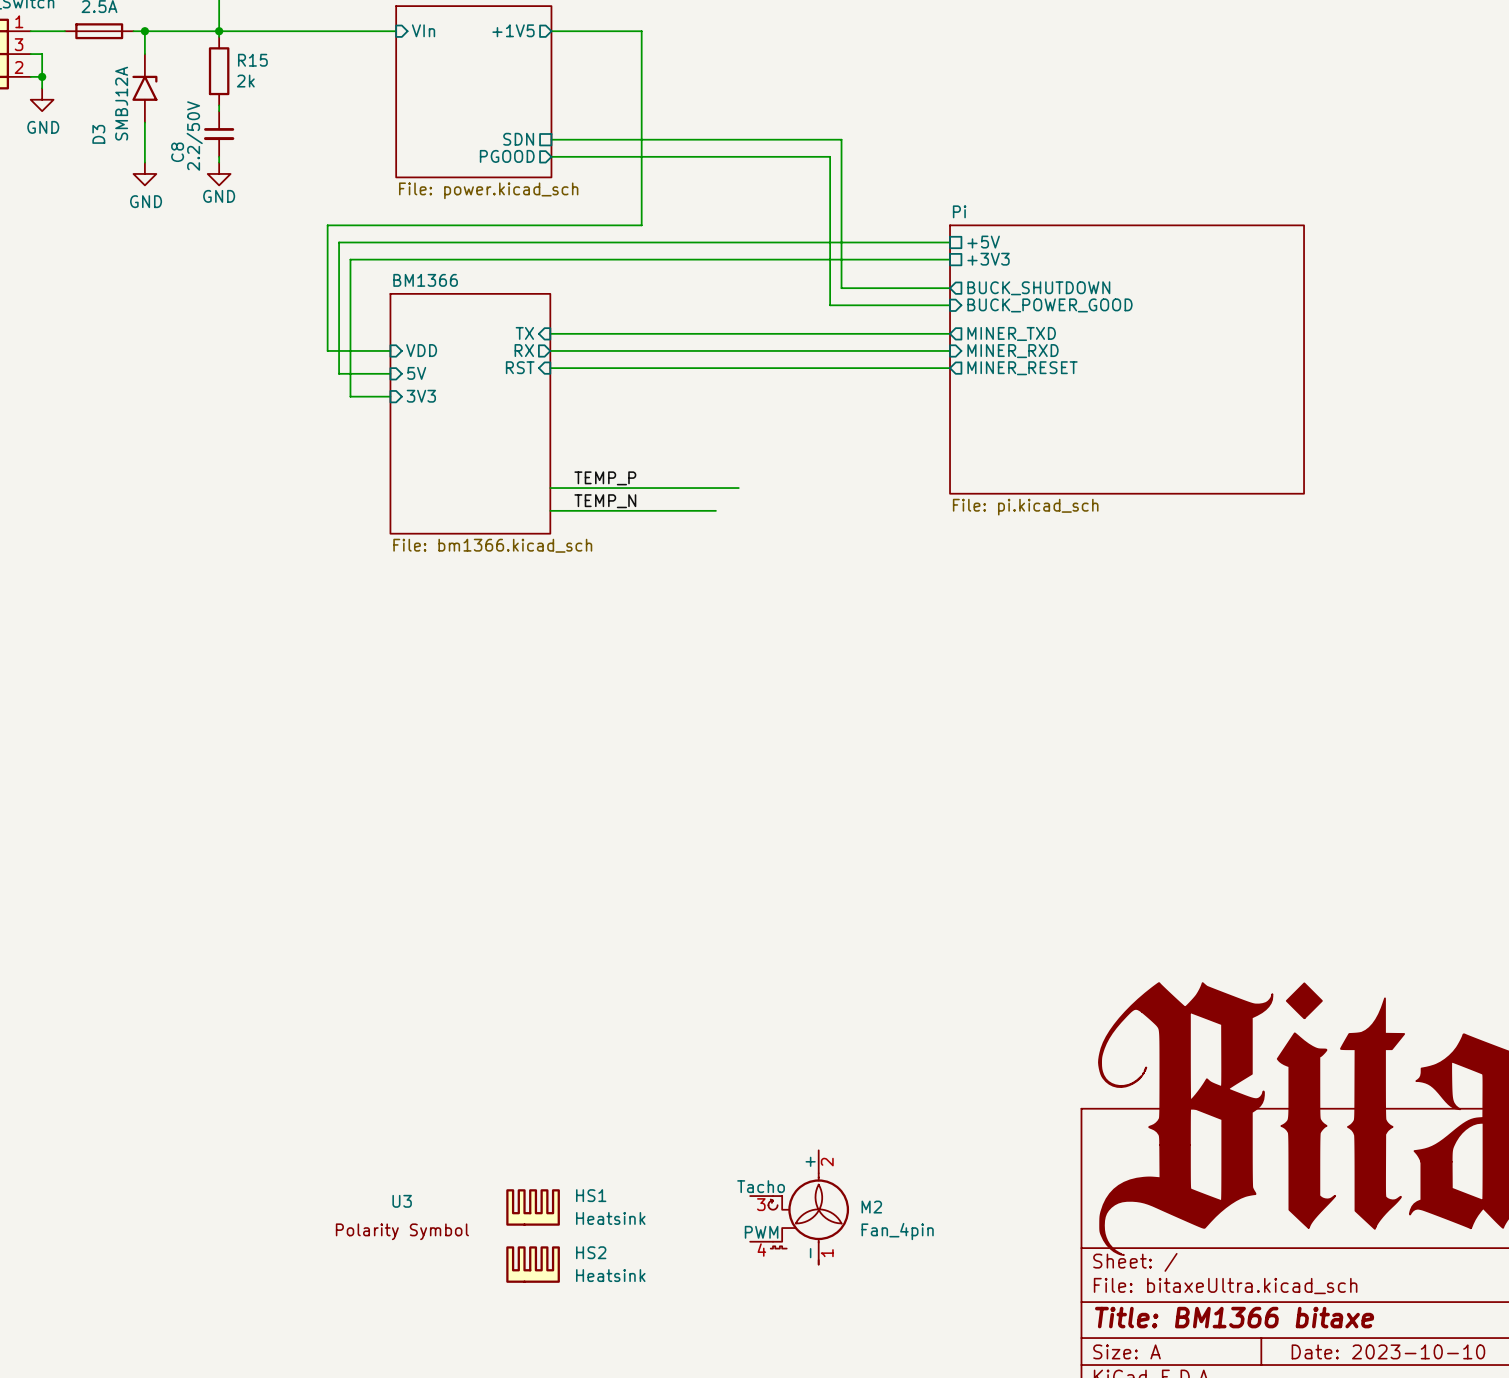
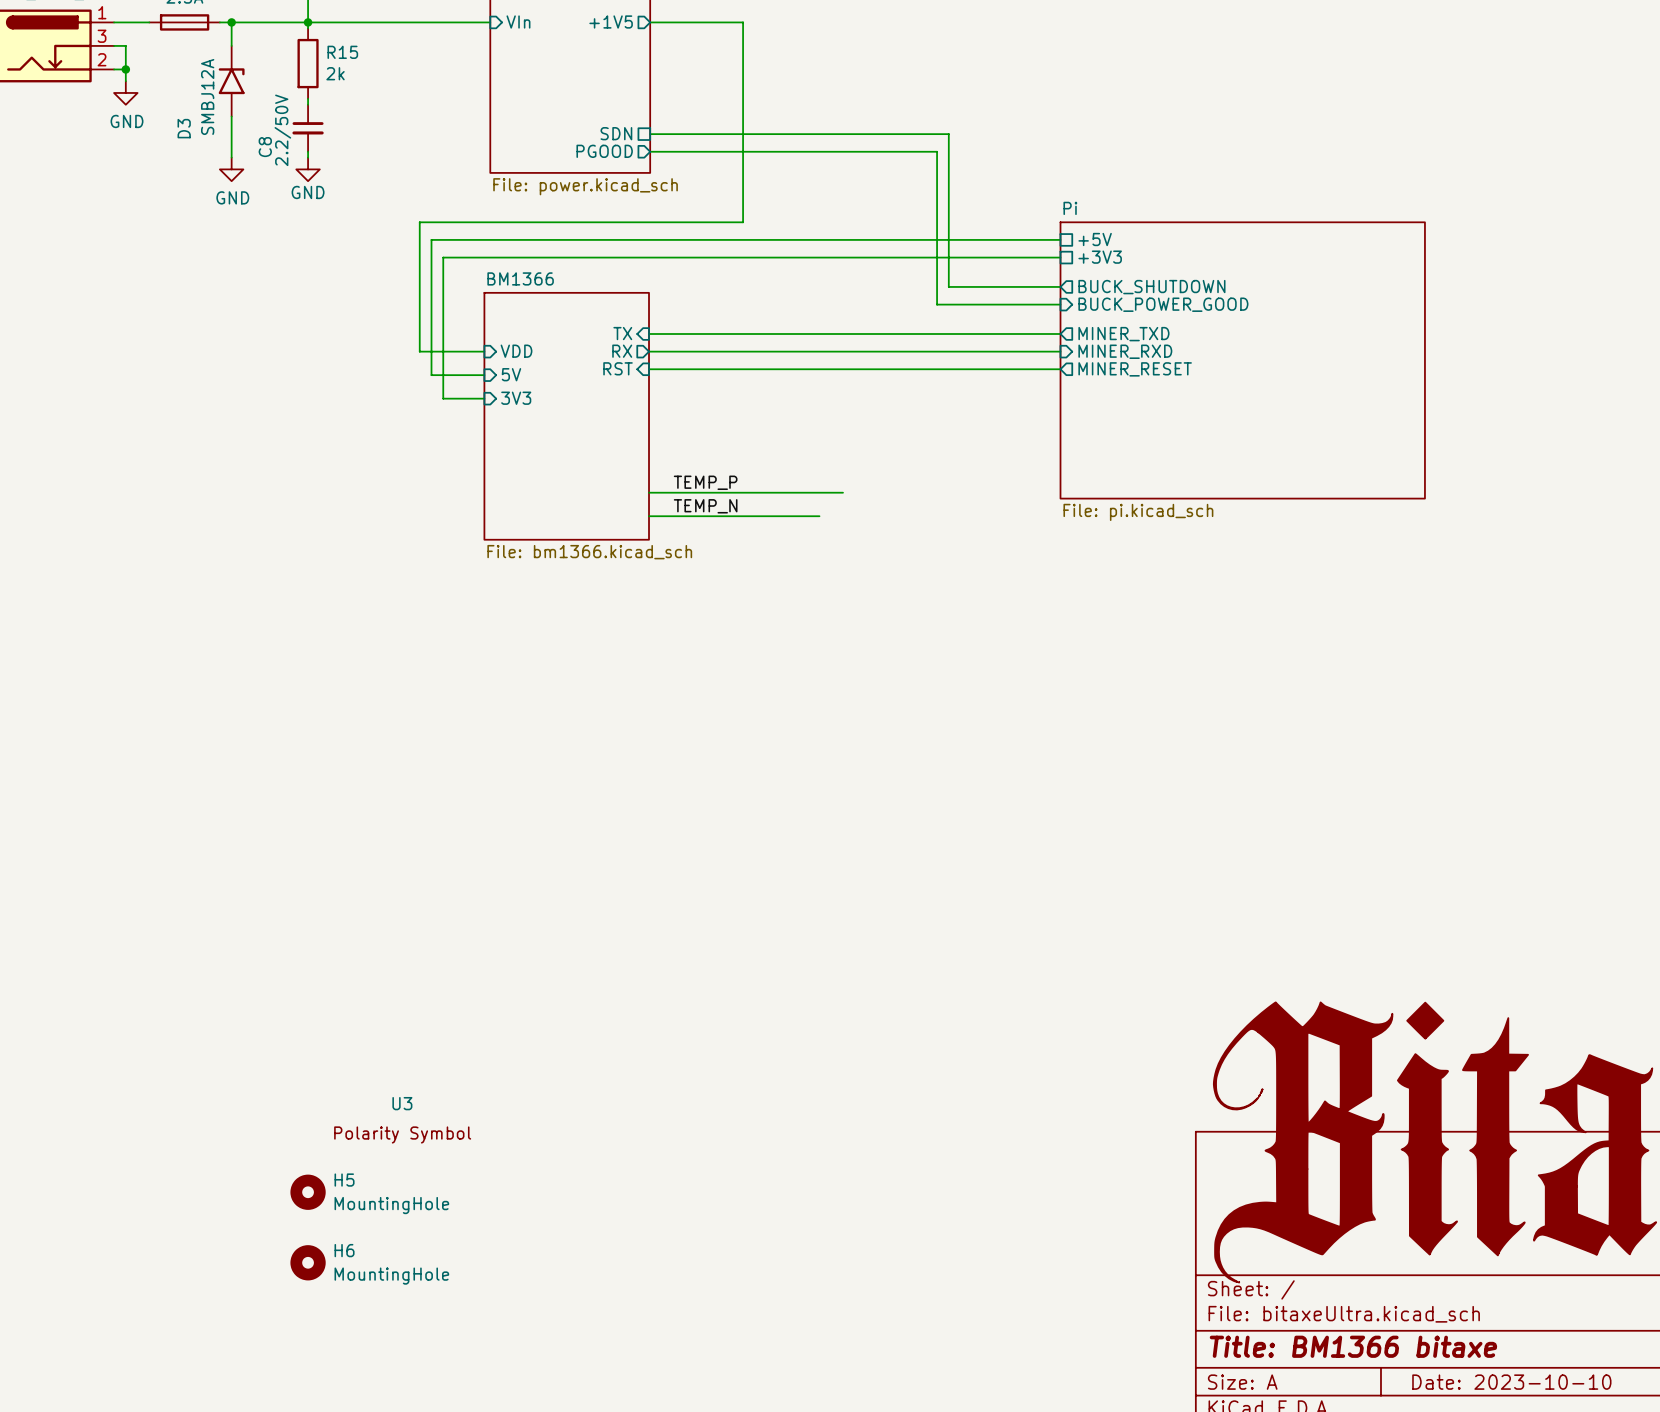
H5: none -> MountingHole (308, 1192)
HS1: Heatsink (533, 1207) -> none
M2: Fan_4pin (799, 1207) -> none
U3 position: (402, 1217) -> (402, 1120)
H6: none -> MountingHole (308, 1262)
HS2: Heatsink (533, 1264) -> none

